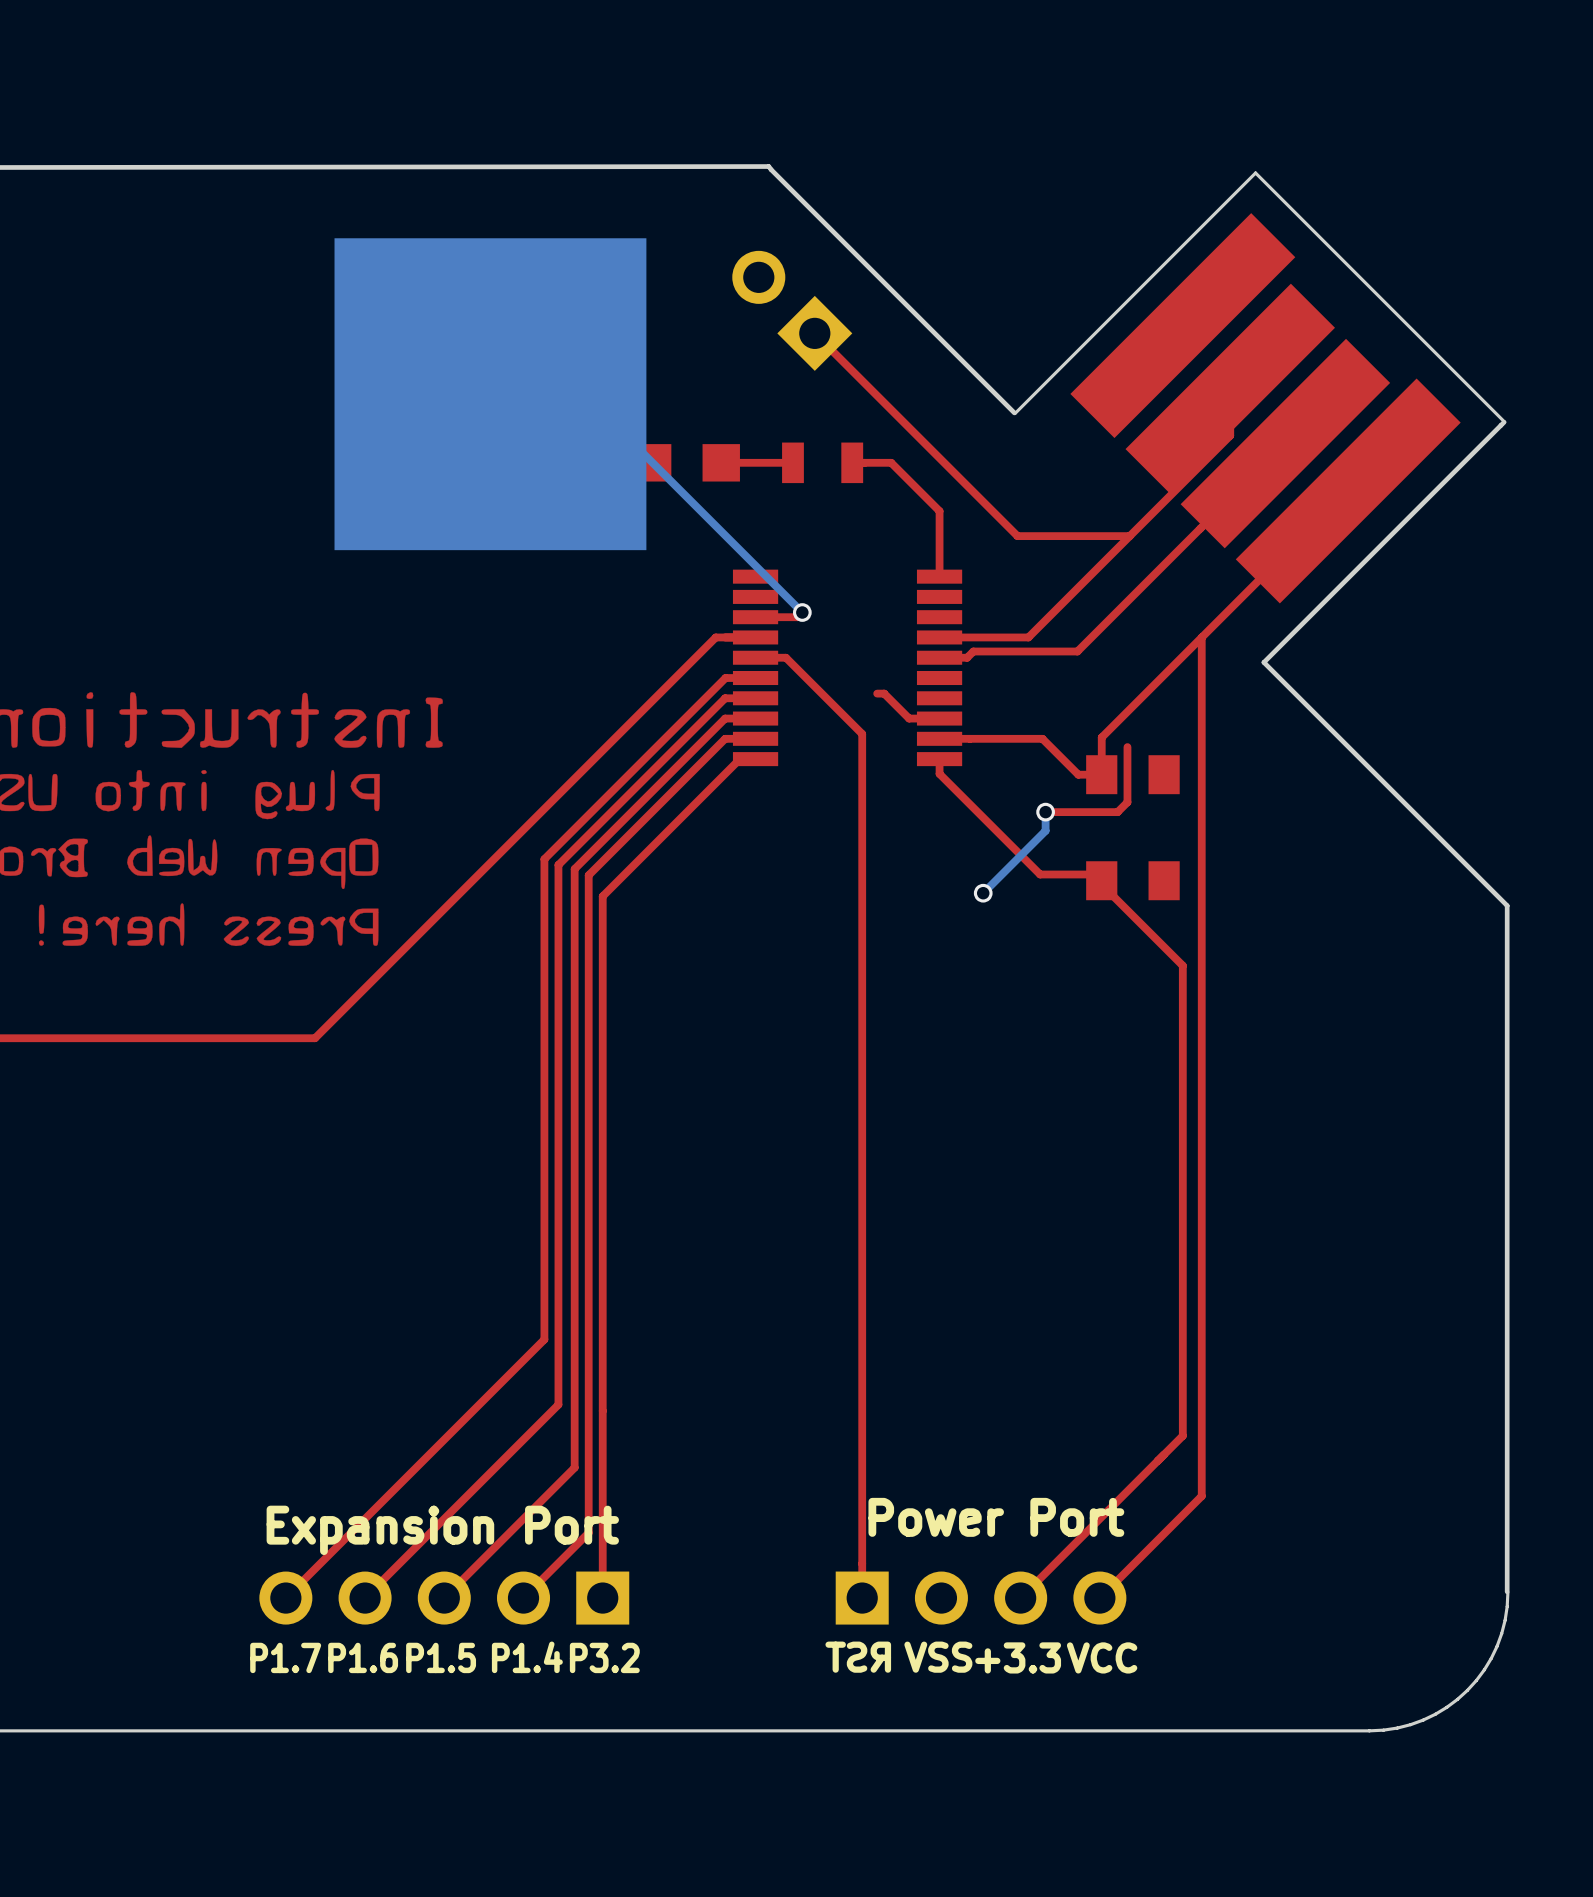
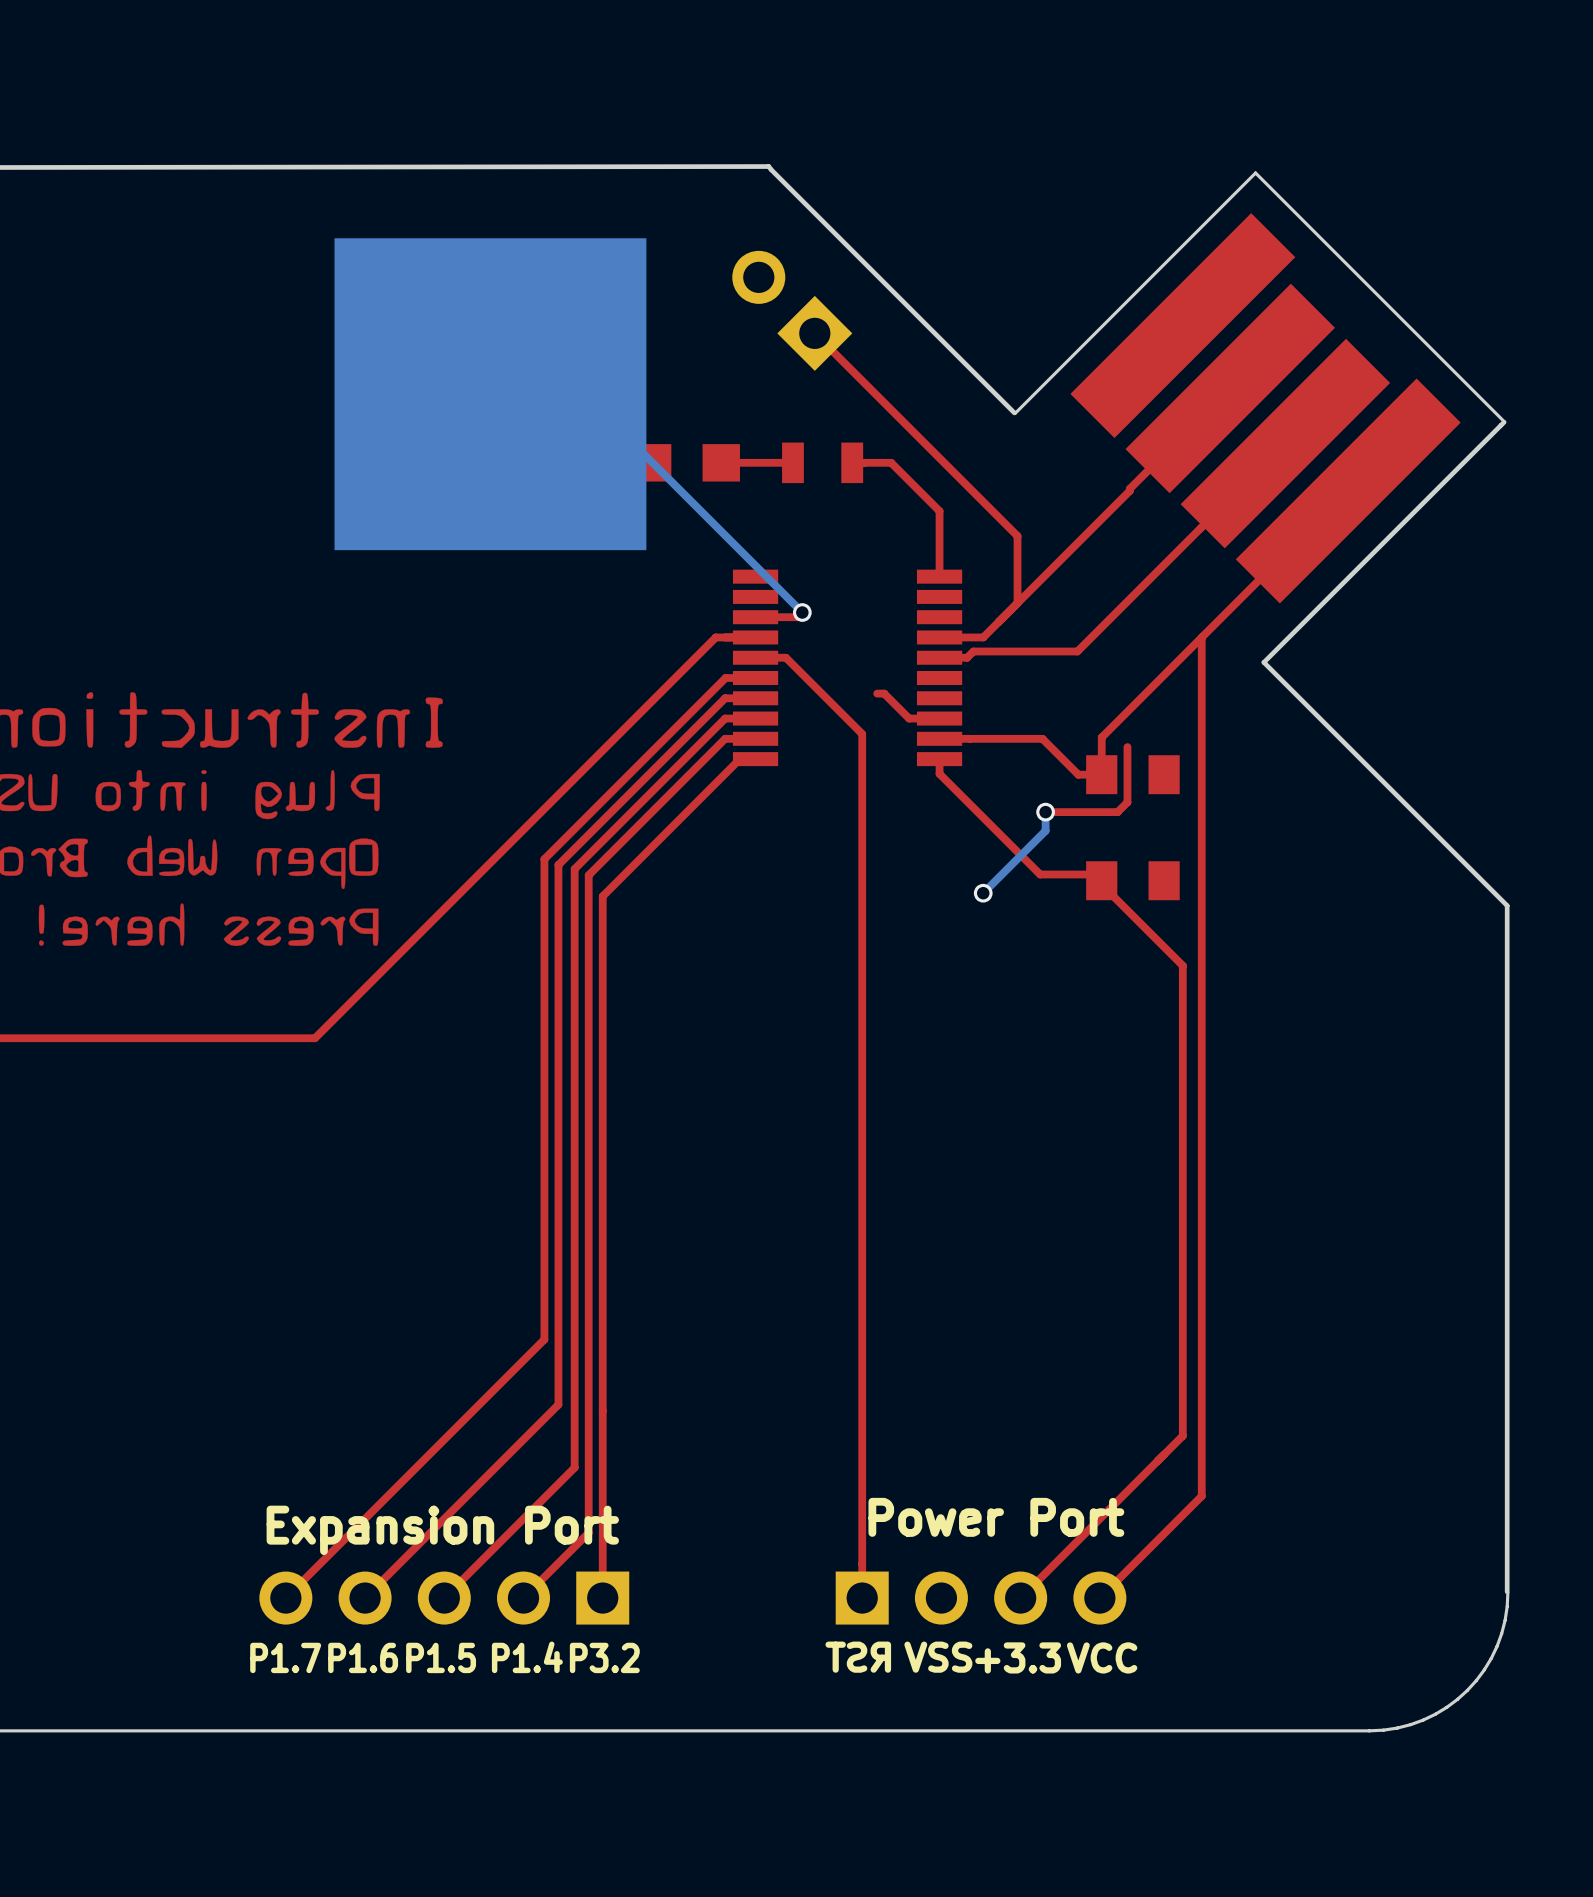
top track: (1230, 388) (1230, 435) (1028, 637) (983, 637) -> (1230, 388) (983, 637)
top track: (1129, 536) (1017, 536) -> (1017, 603) (1017, 536)

